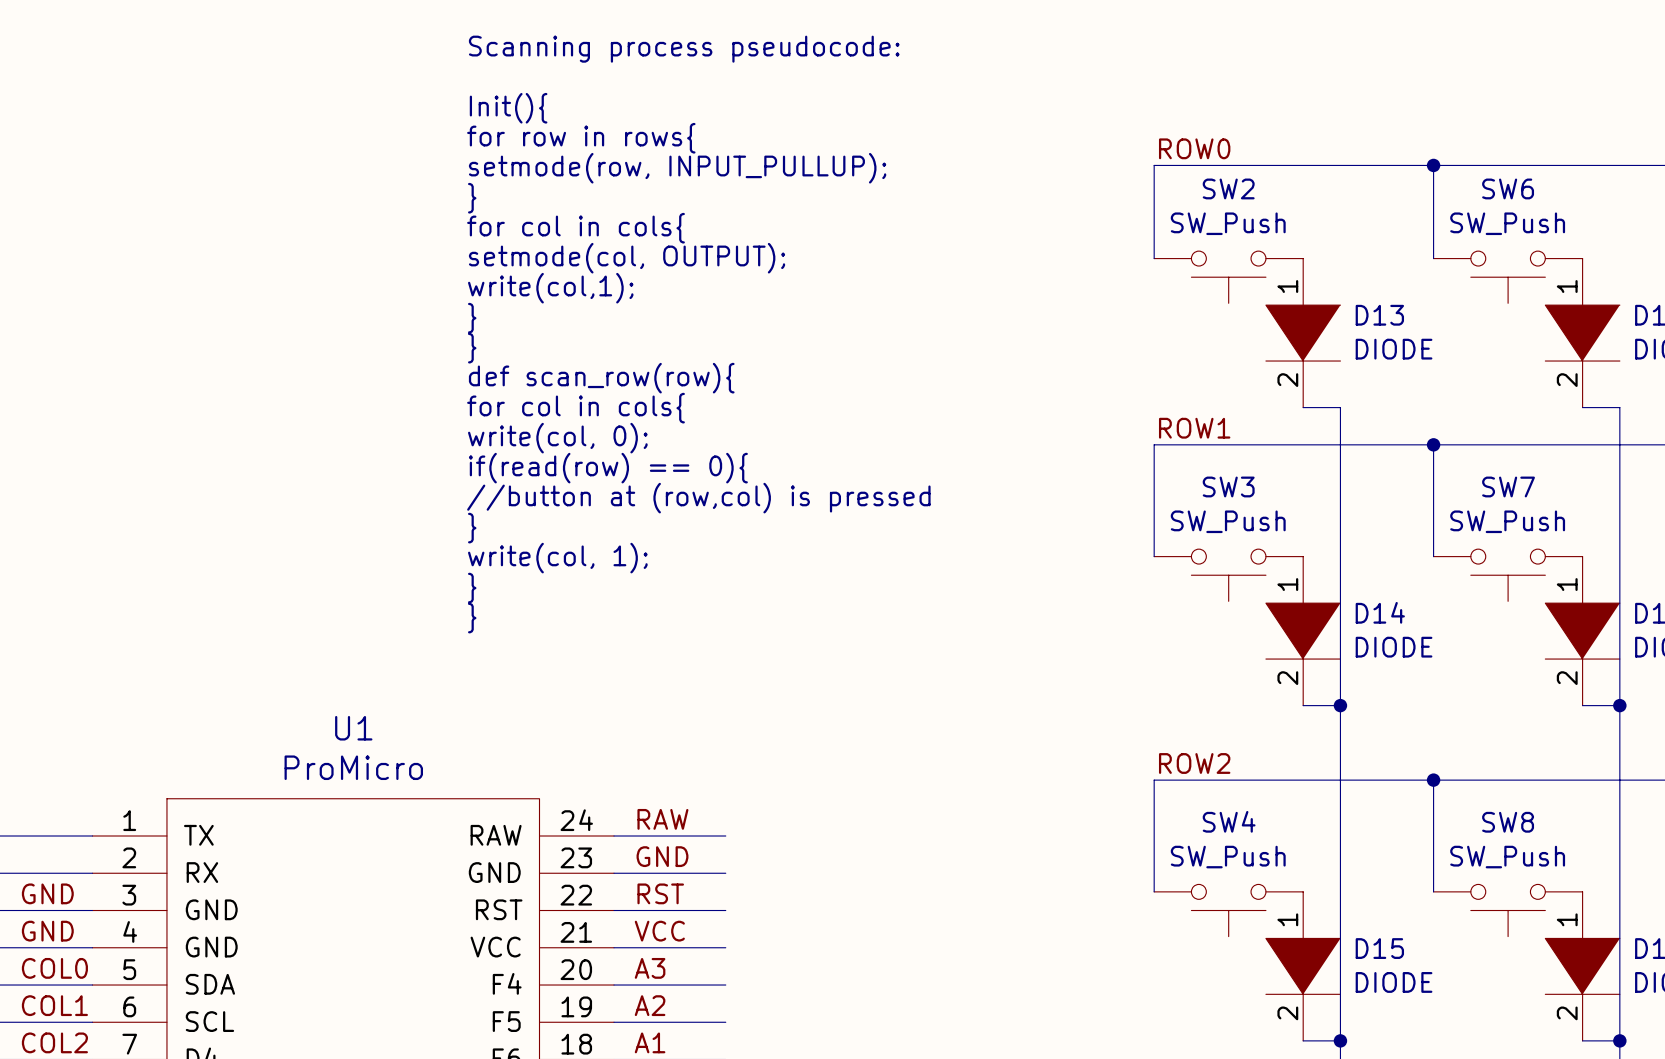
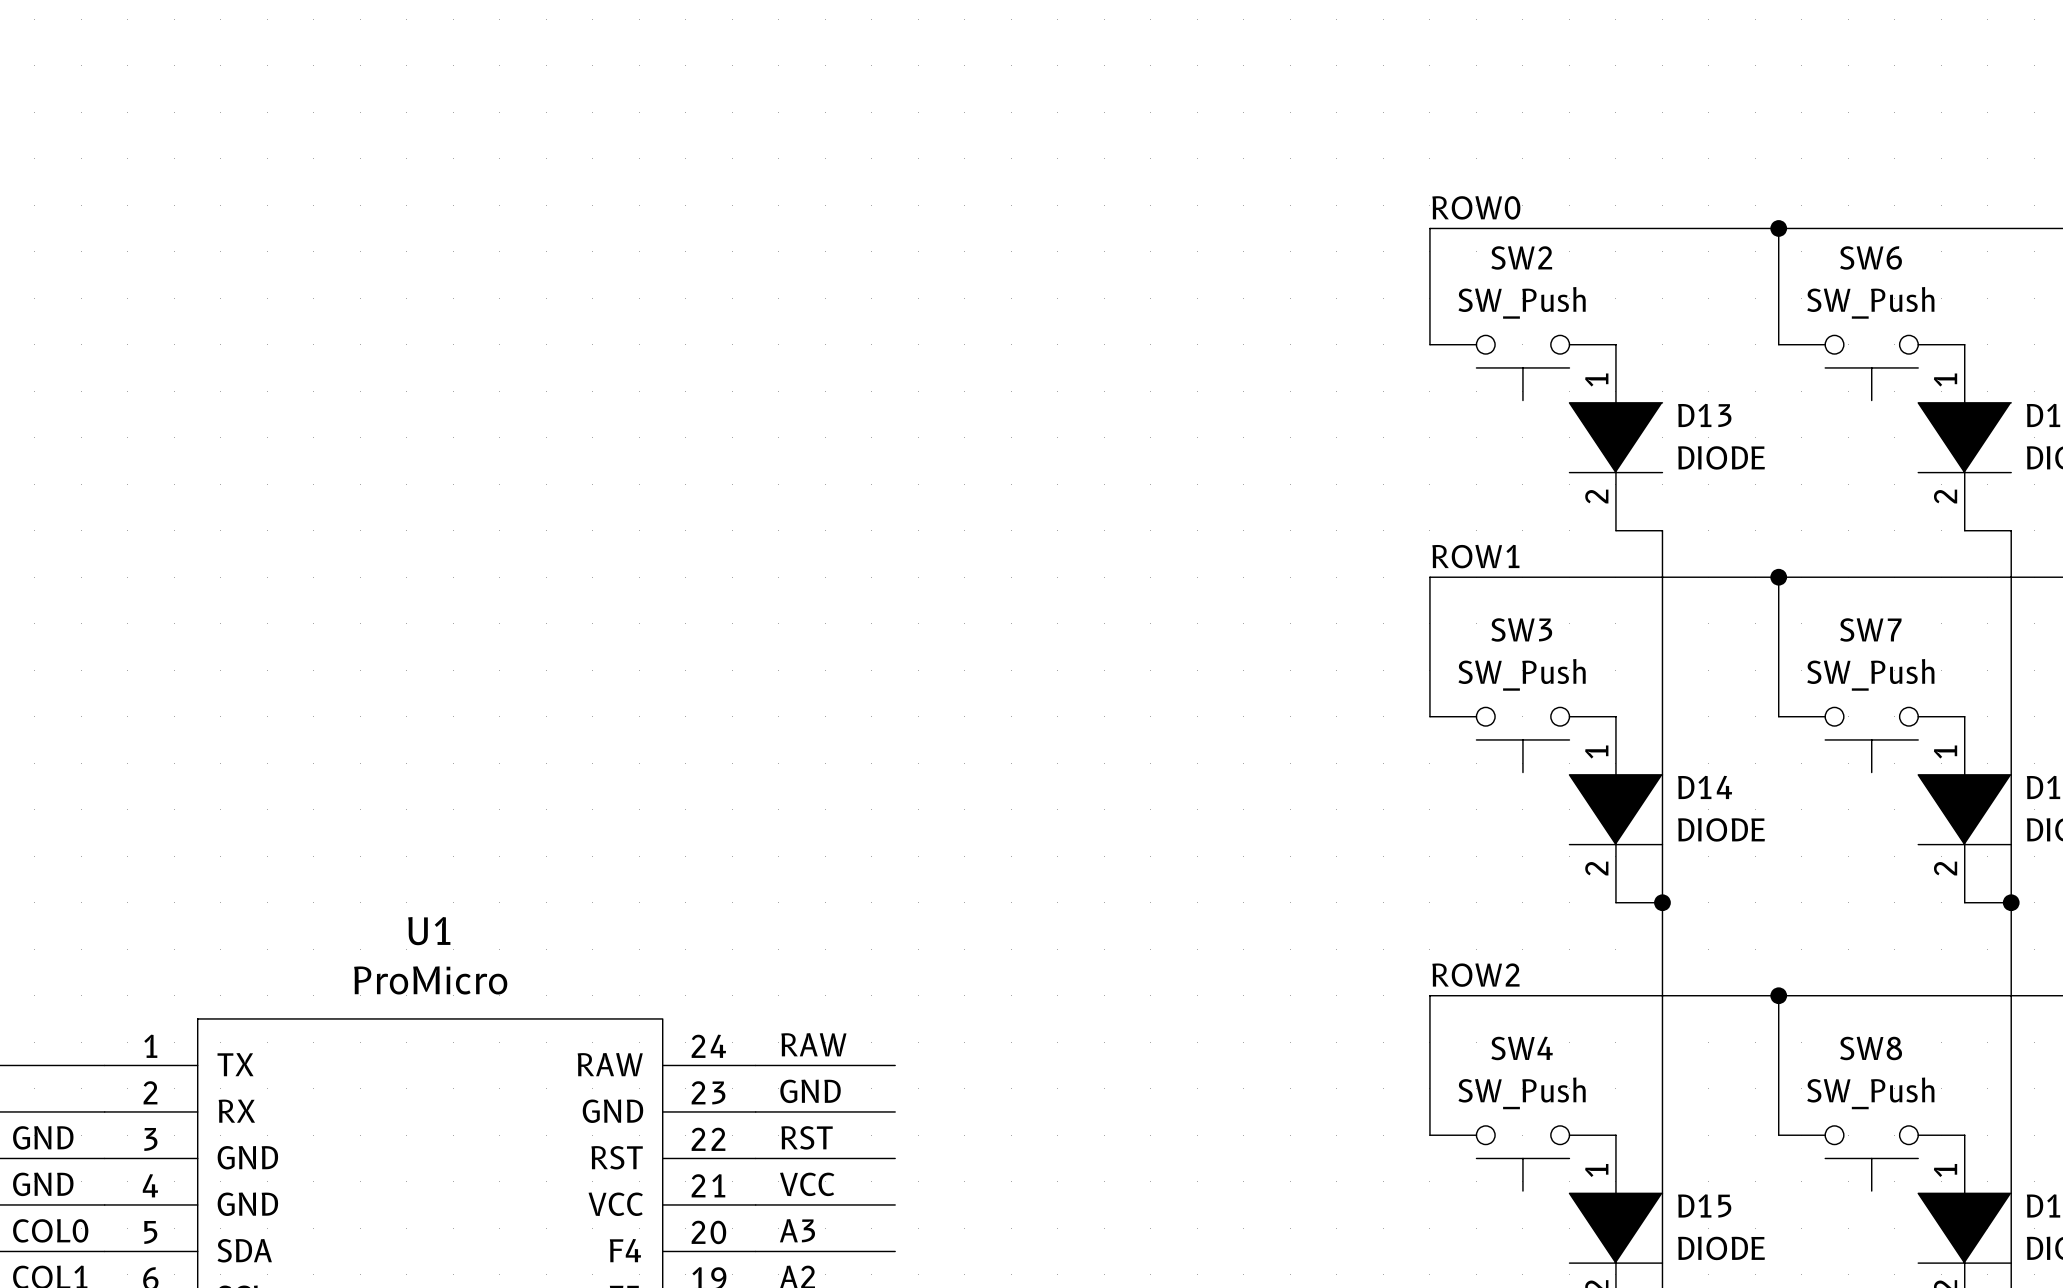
text: Scanning process pseudocode: (684, 49) -> none
text: Init(){ (508, 108) -> none
text: for row in rows{ (581, 138) -> none
text: setmode(row, INPUT_PULLUP); (677, 168) -> none
text: } (472, 198) -> none
text: for col in cols{ (576, 228) -> none
text: setmode(col, OUTPUT); (627, 258) -> none
text: write(col,1); (550, 288) -> none
text: } (472, 318) -> none
text: } (472, 348) -> none
text: def scan_row(row){ (601, 378) -> none
text: for col in cols{ (576, 408) -> none
text: write(col, 0); (557, 438) -> none
text: if(read(row) == 0){ (608, 468) -> none
text: //button at (row,col) is pressed (698, 498) -> none
text: } (472, 528) -> none
text: write(col, 1); (557, 558) -> none
text: } (472, 588) -> none
text: } (472, 618) -> none

